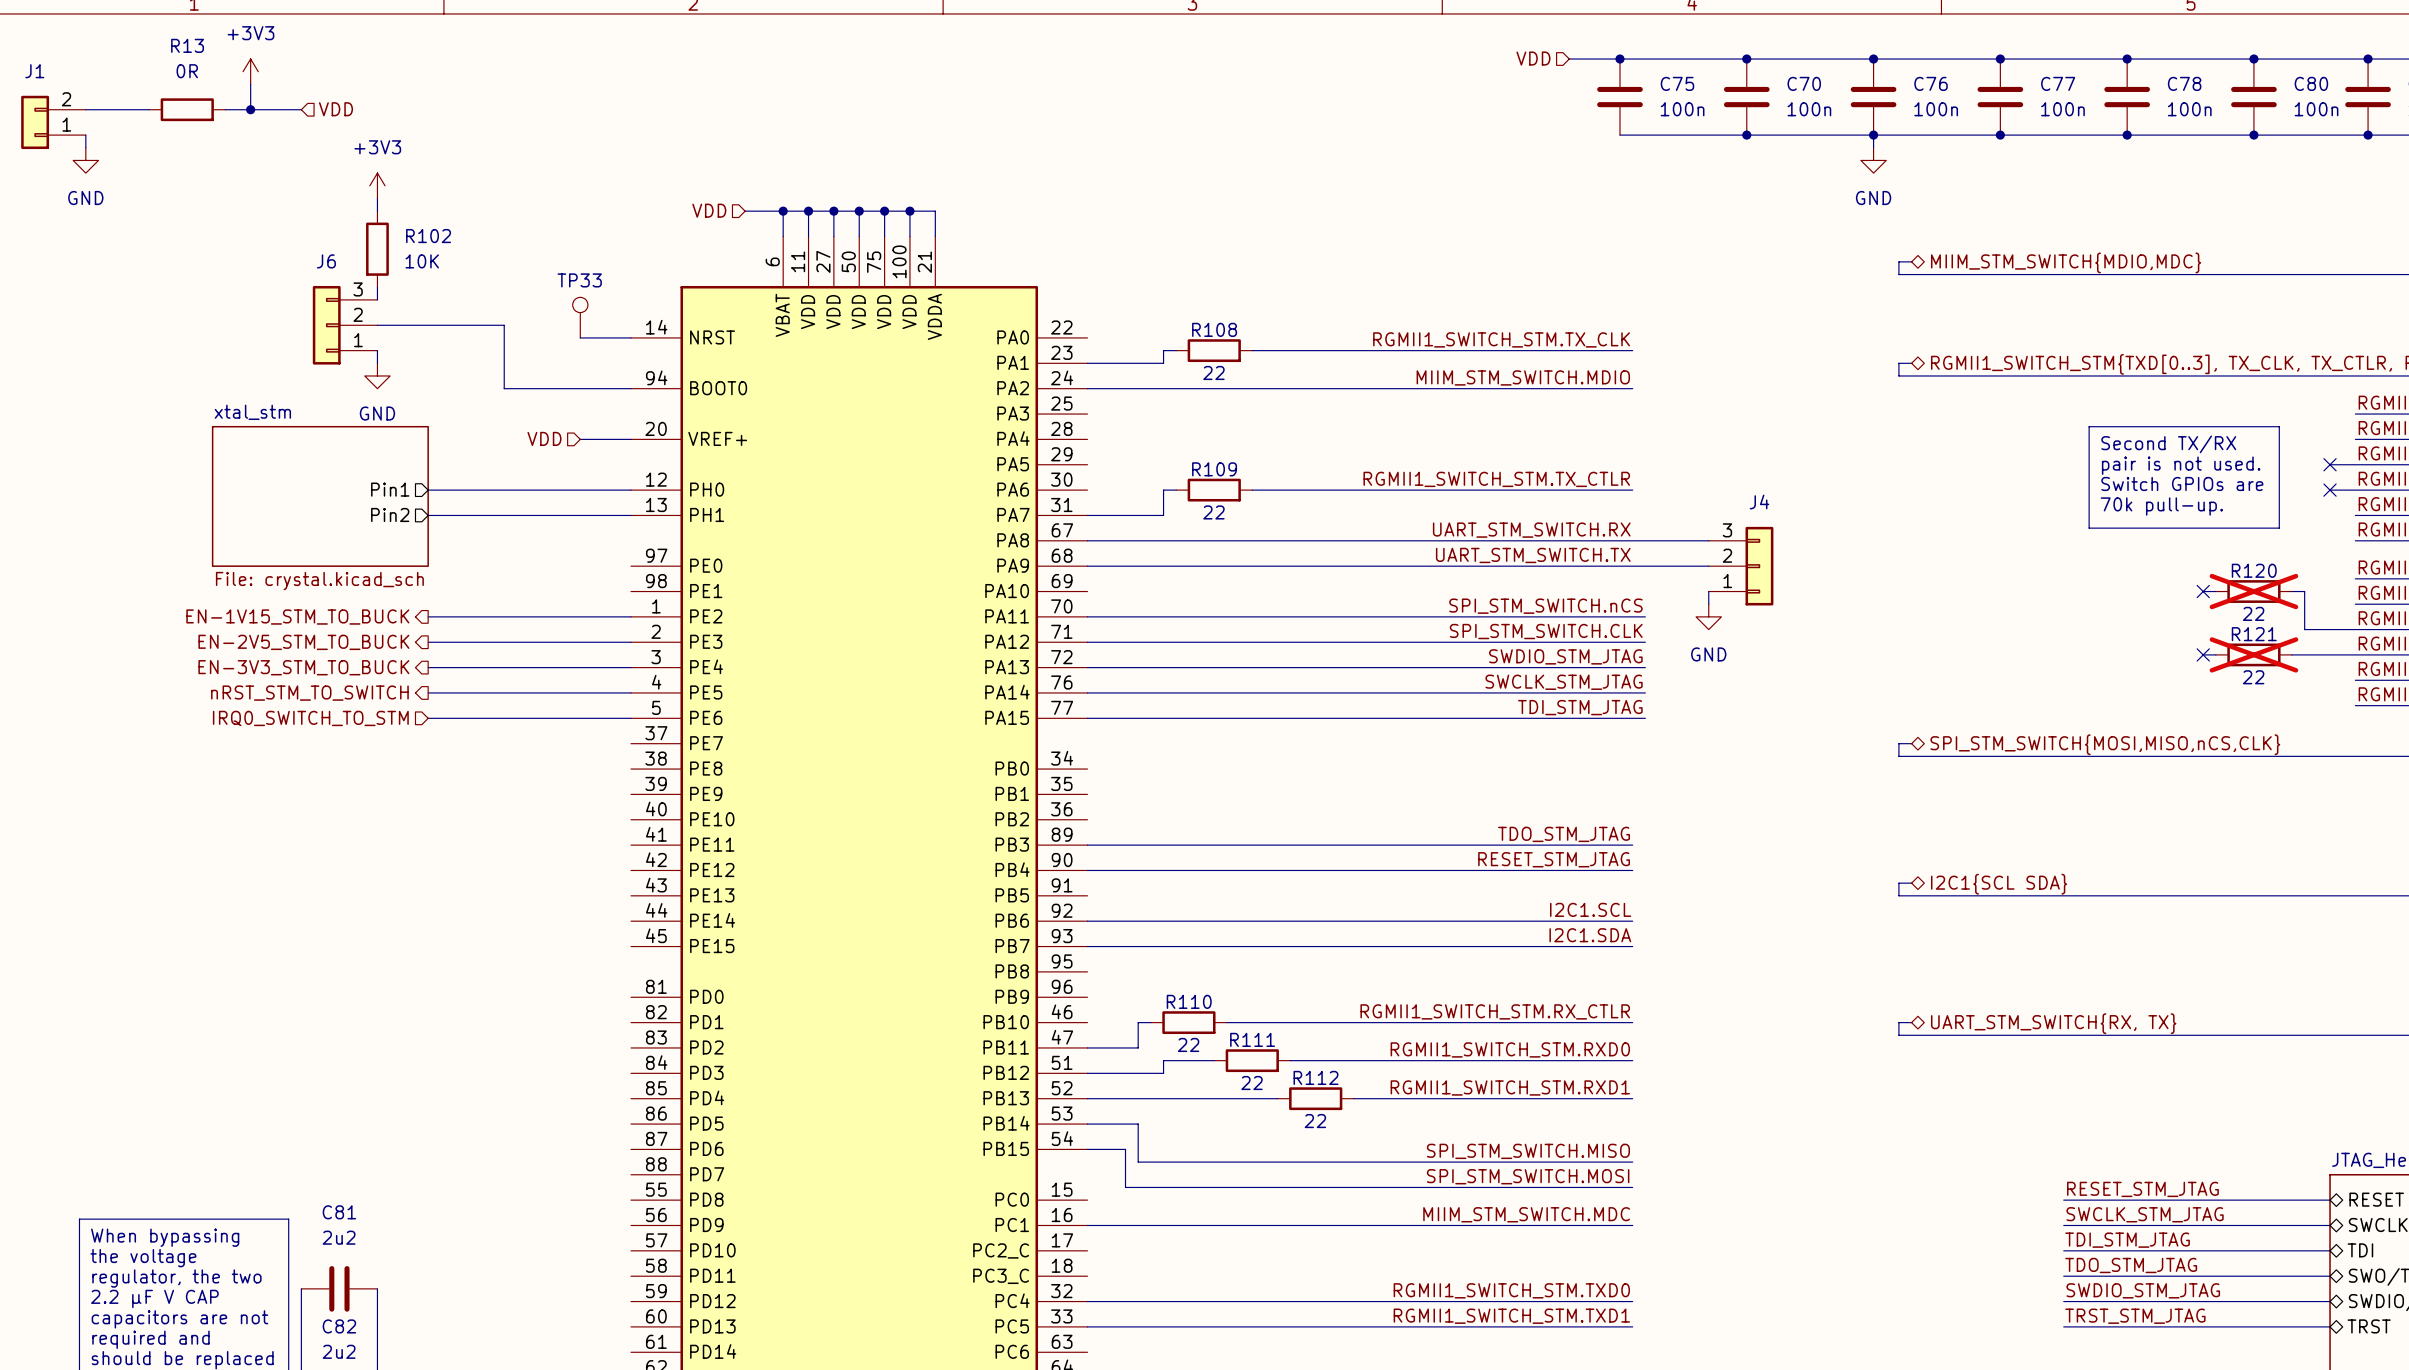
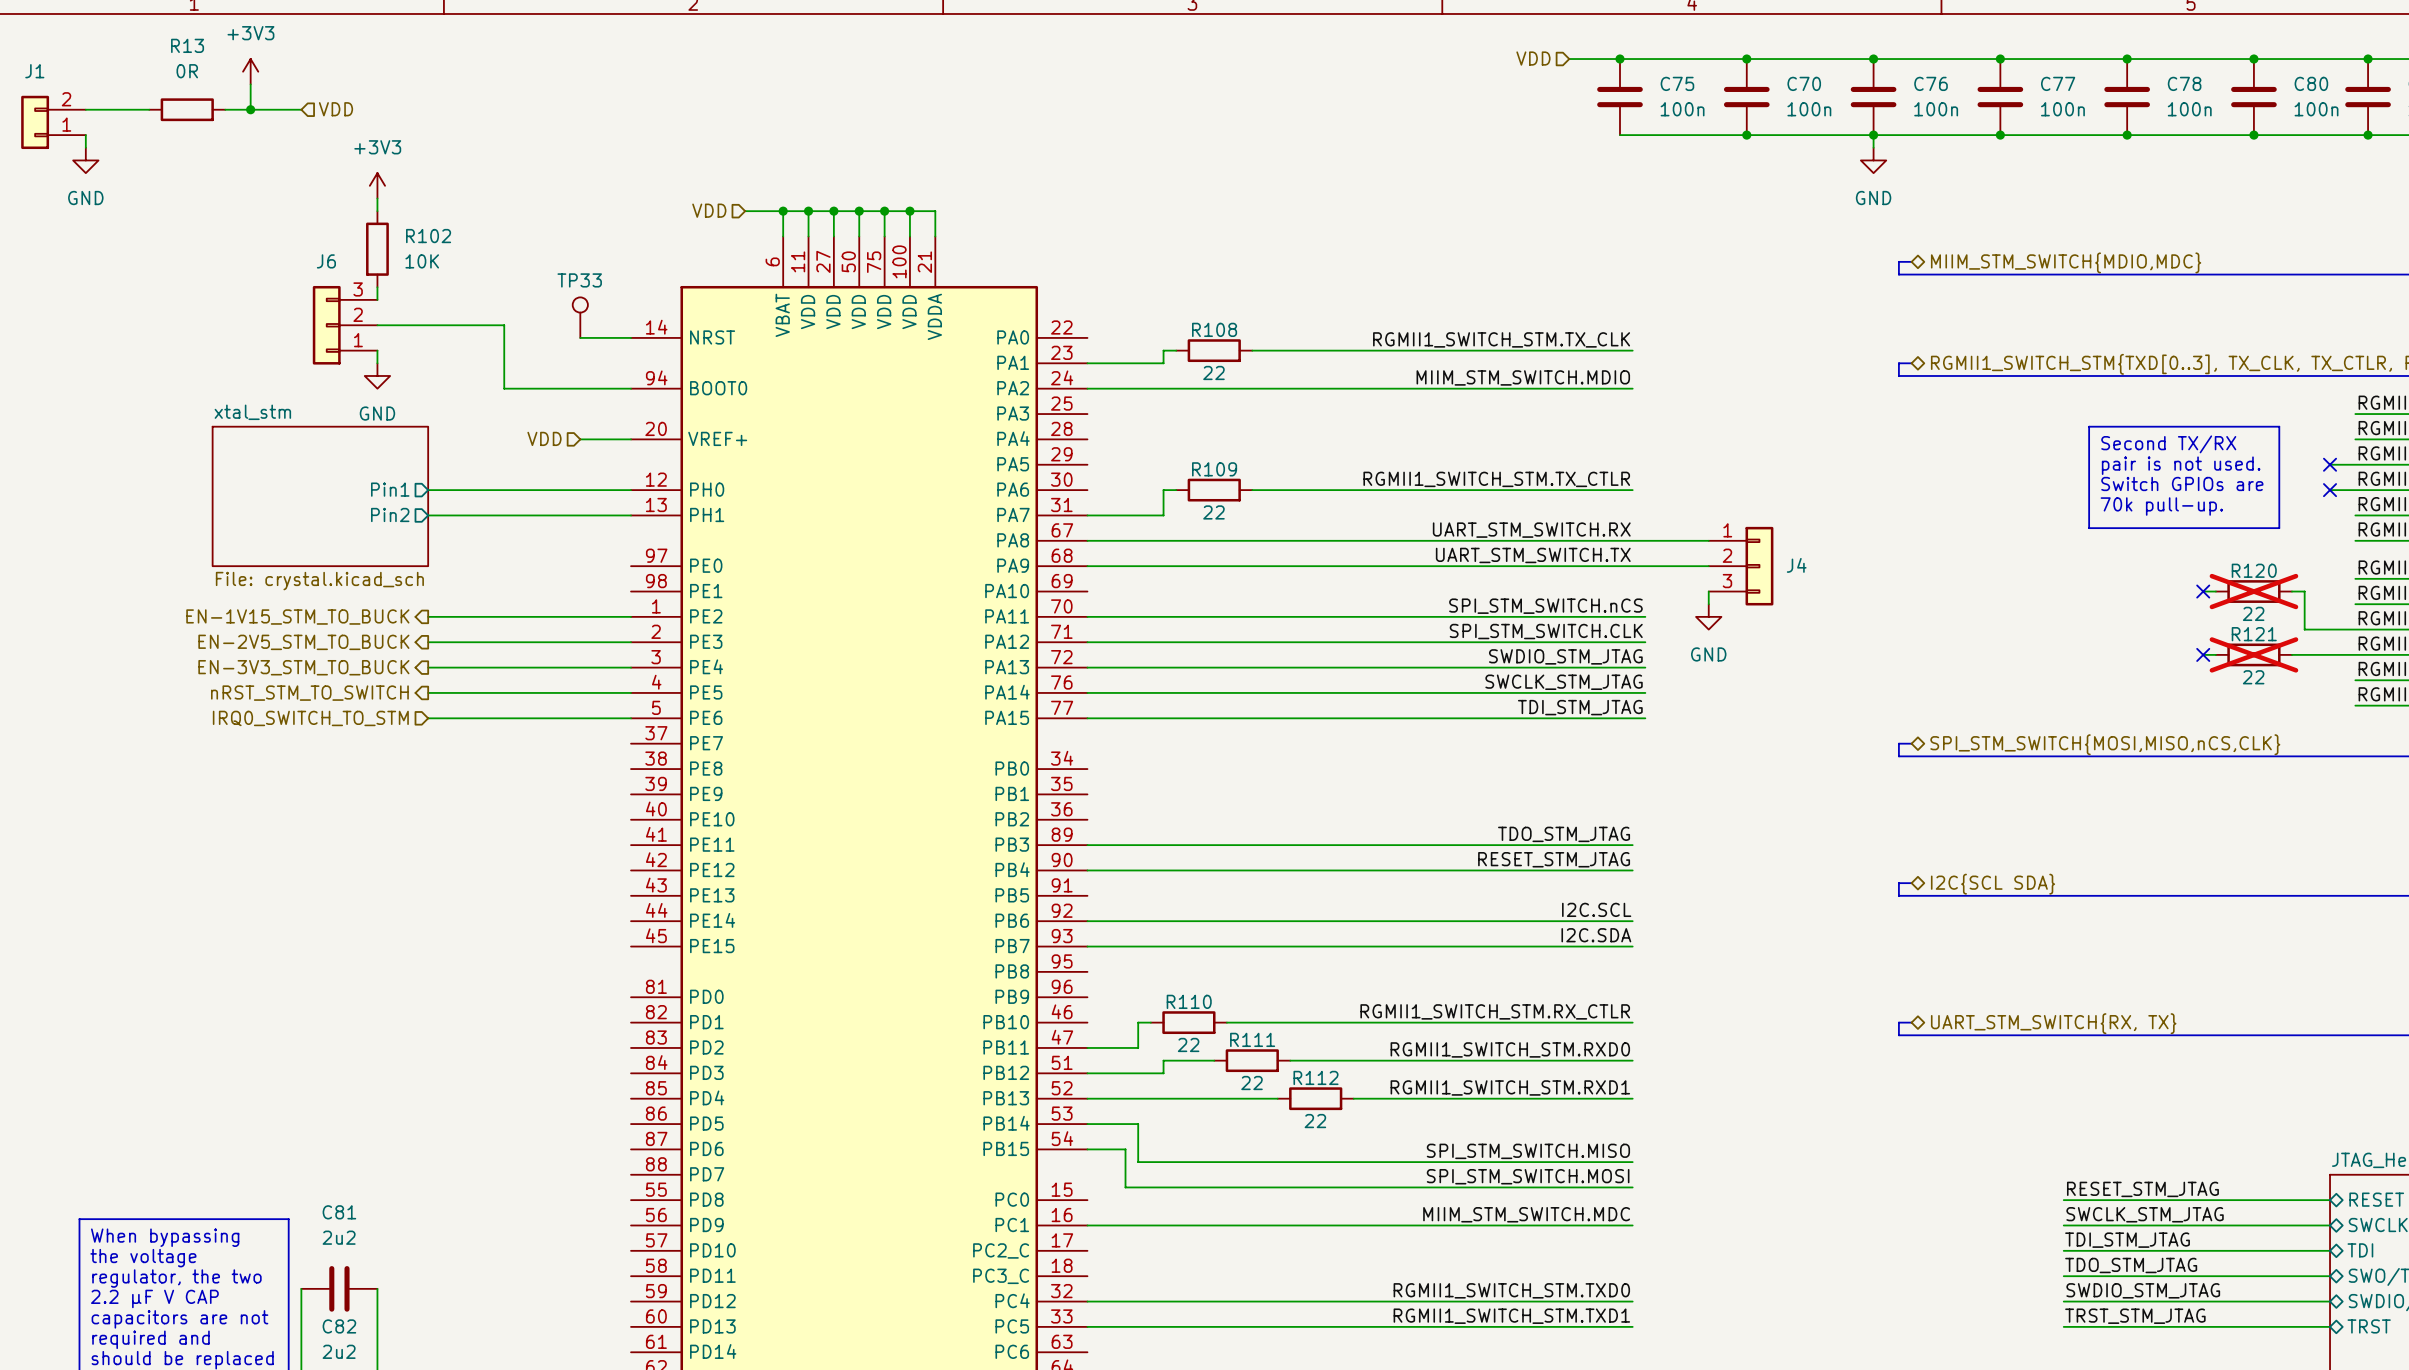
J4 name position: J4 (1759, 502) -> J4 (1796, 565)
J4 flip: as is (1759, 566) -> up-down (1759, 566)
hierarchical label: I2C1{SCL SDA} (1999, 884) -> I2C{SCL SDA} (1993, 884)
label: I2C1.SCL (1590, 909) -> I2C.SCL (1596, 909)
label: I2C1.SDA (1590, 935) -> I2C.SDA (1596, 935)

